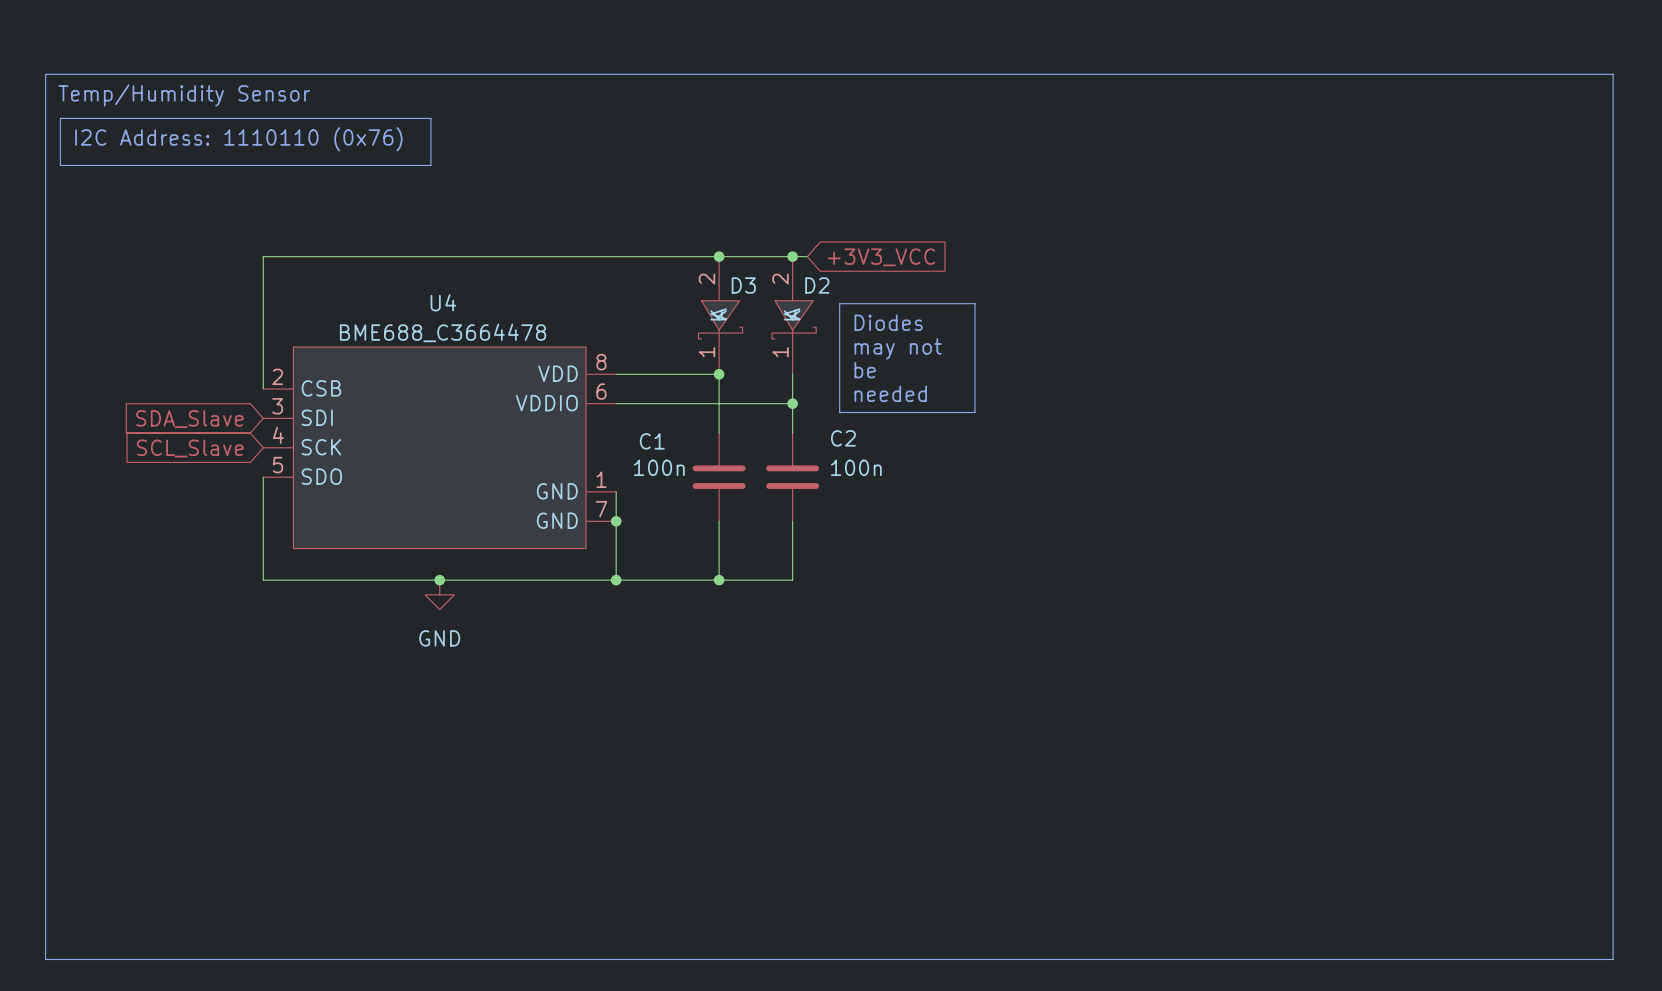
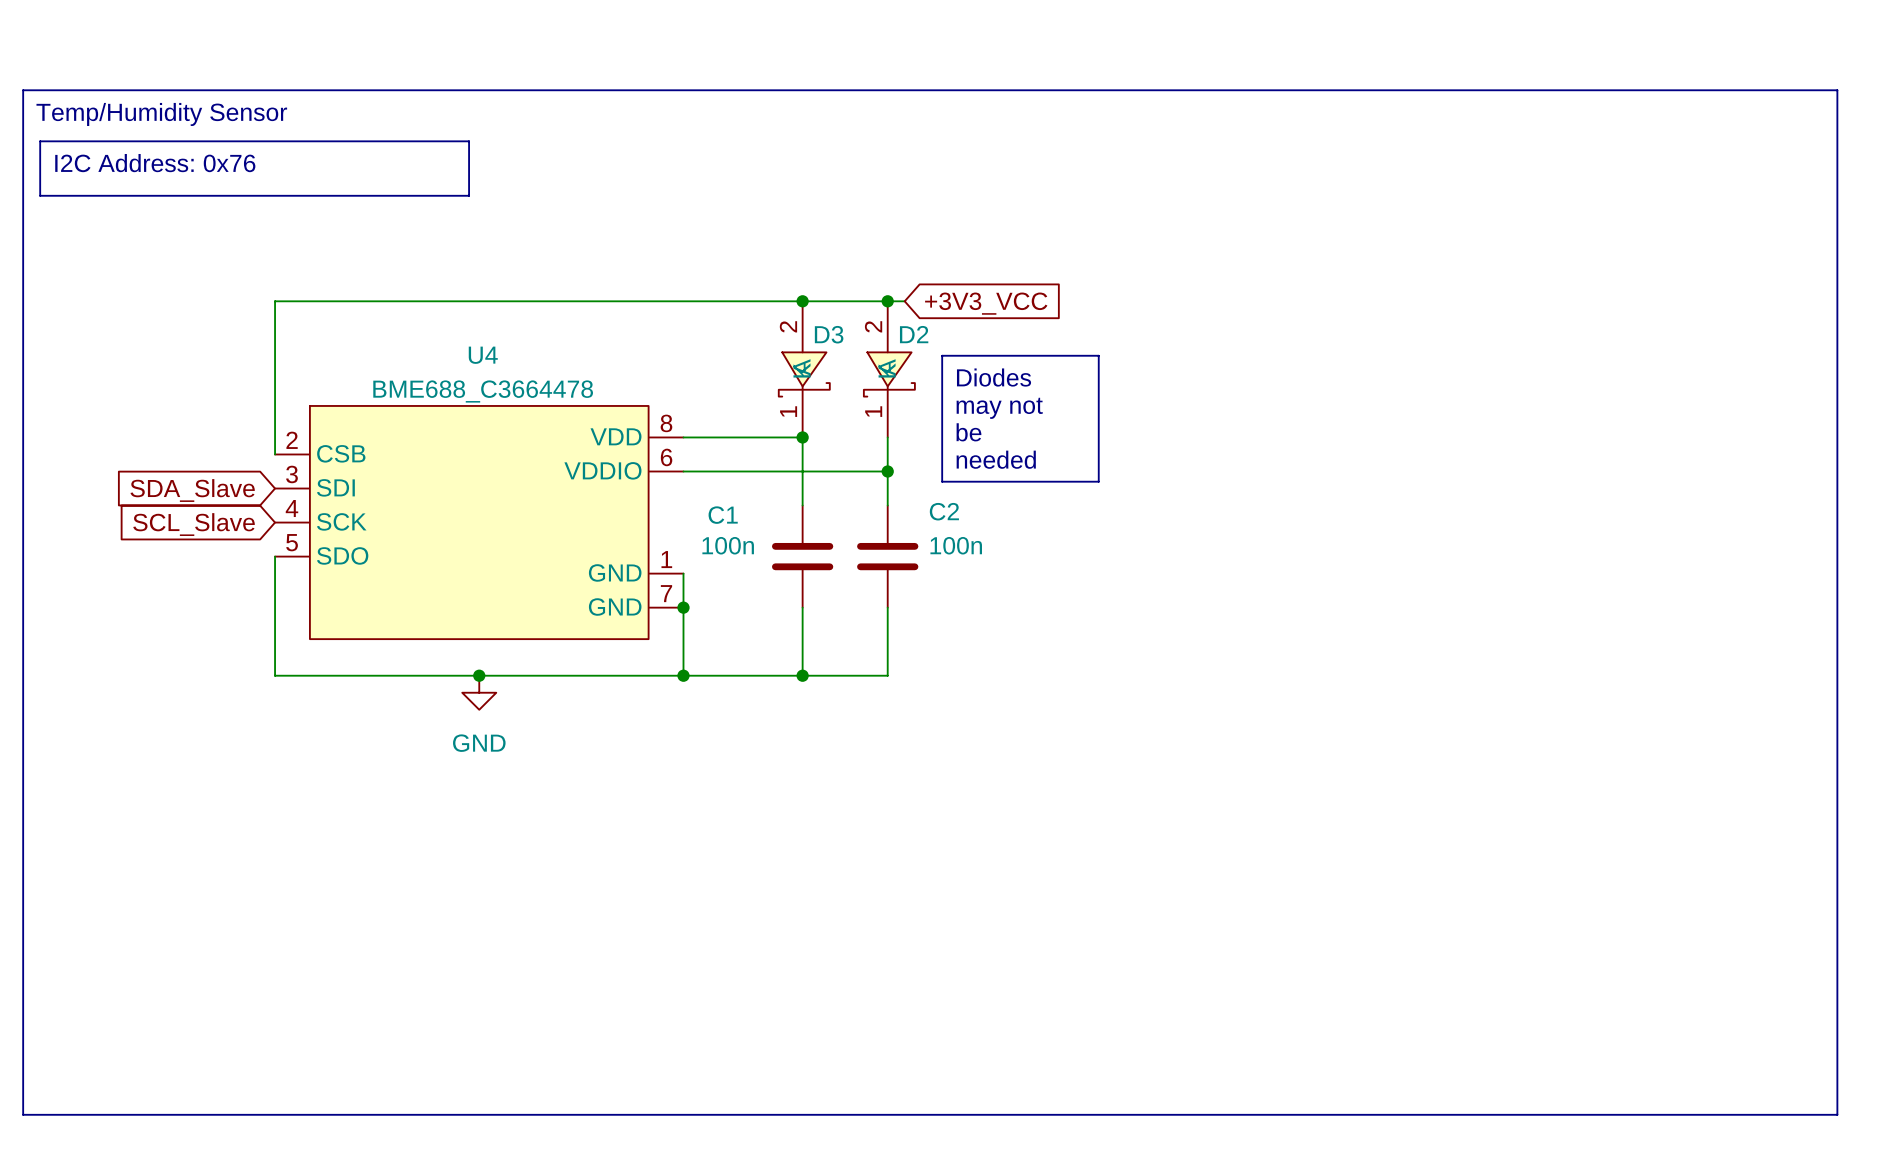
text: I2C Address: 1110110 (0x76) (238, 139) -> I2C Address: 0x76 (155, 163)

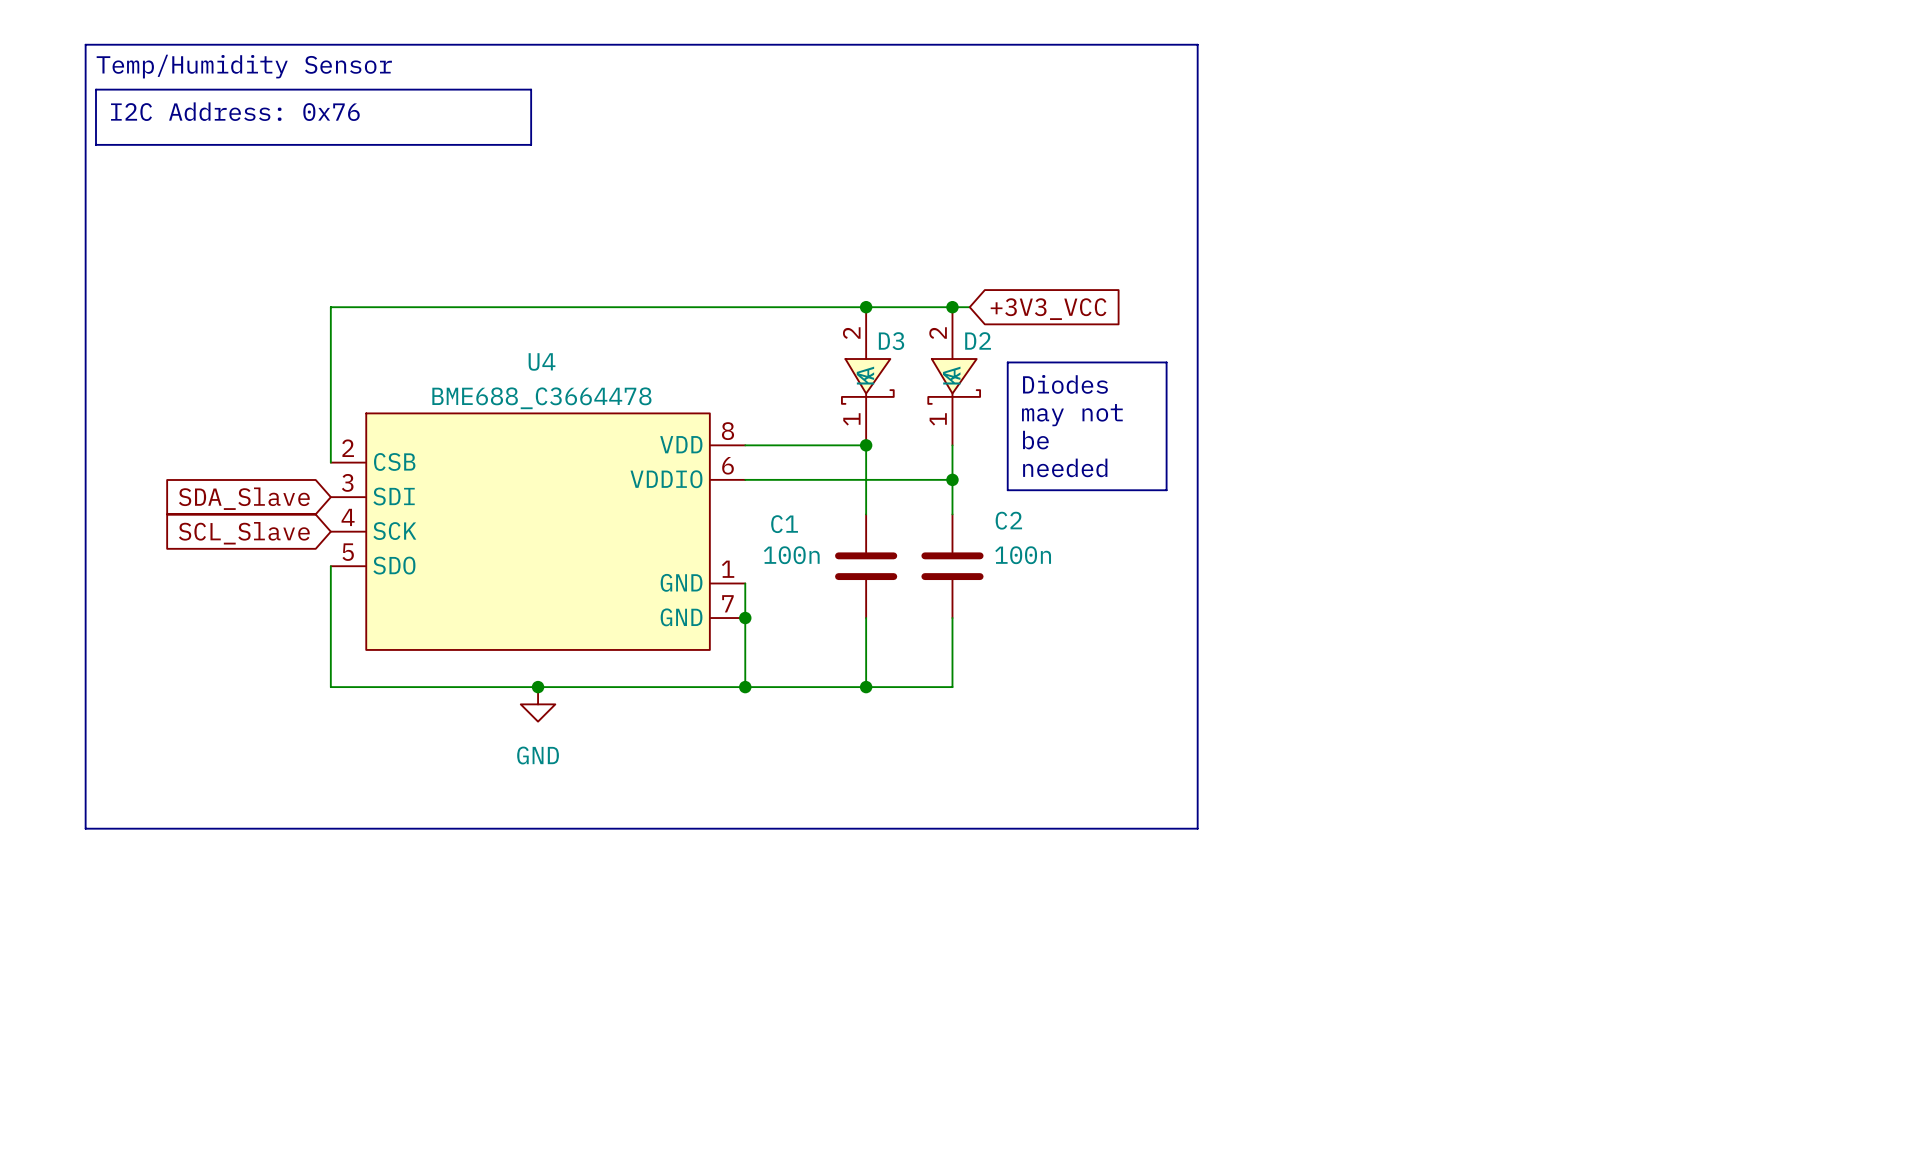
line: none -> (85, 44) (1197, 44) (1197, 828) (85, 828) (85, 44)
line: (23, 90) (1837, 90) (1837, 1114) (23, 1114) (23, 90) -> none
text position: Temp/Humidity Sensor (161, 114) -> Temp/Humidity Sensor (244, 66)
line: (43, 141) (40, 141) (40, 195) (469, 195) (469, 141) -> (95, 144) (95, 89) (531, 89) (531, 144) (527, 144)
text position: I2C Address: 0x76 (155, 163) -> I2C Address: 0x76 (235, 111)

